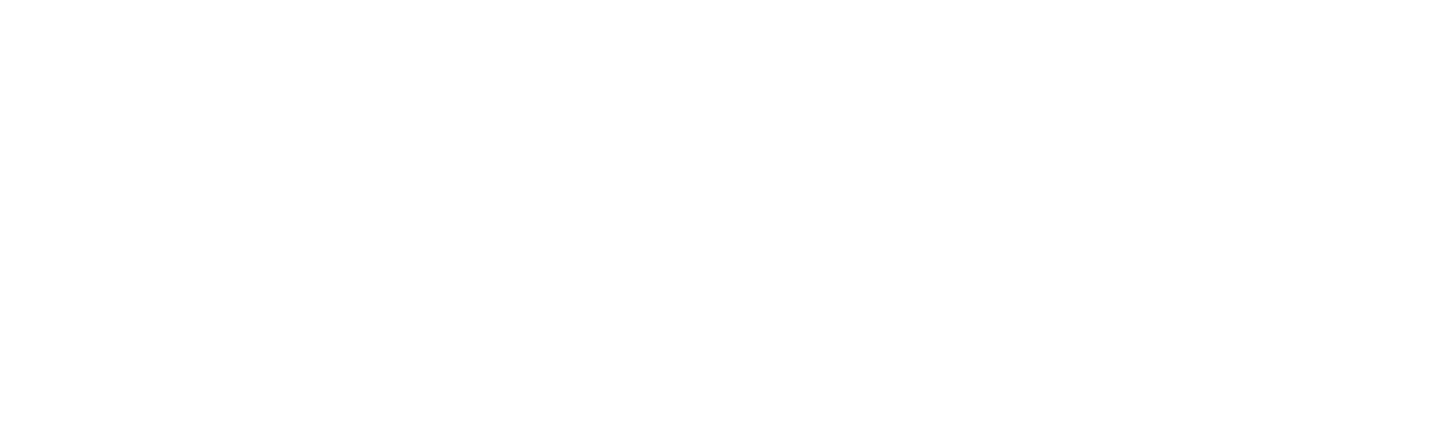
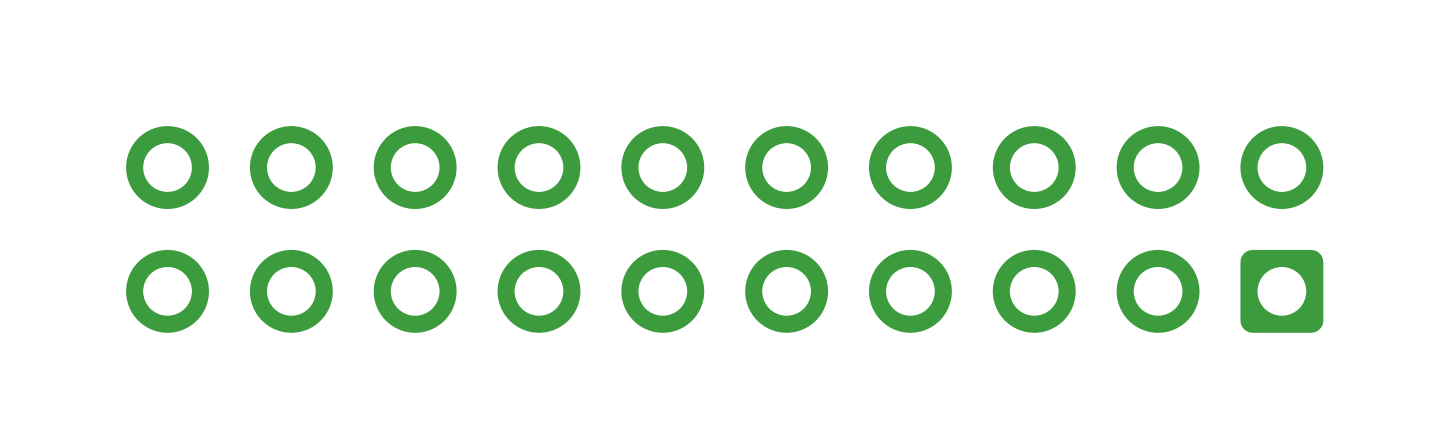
part: none -> (724, 229)

